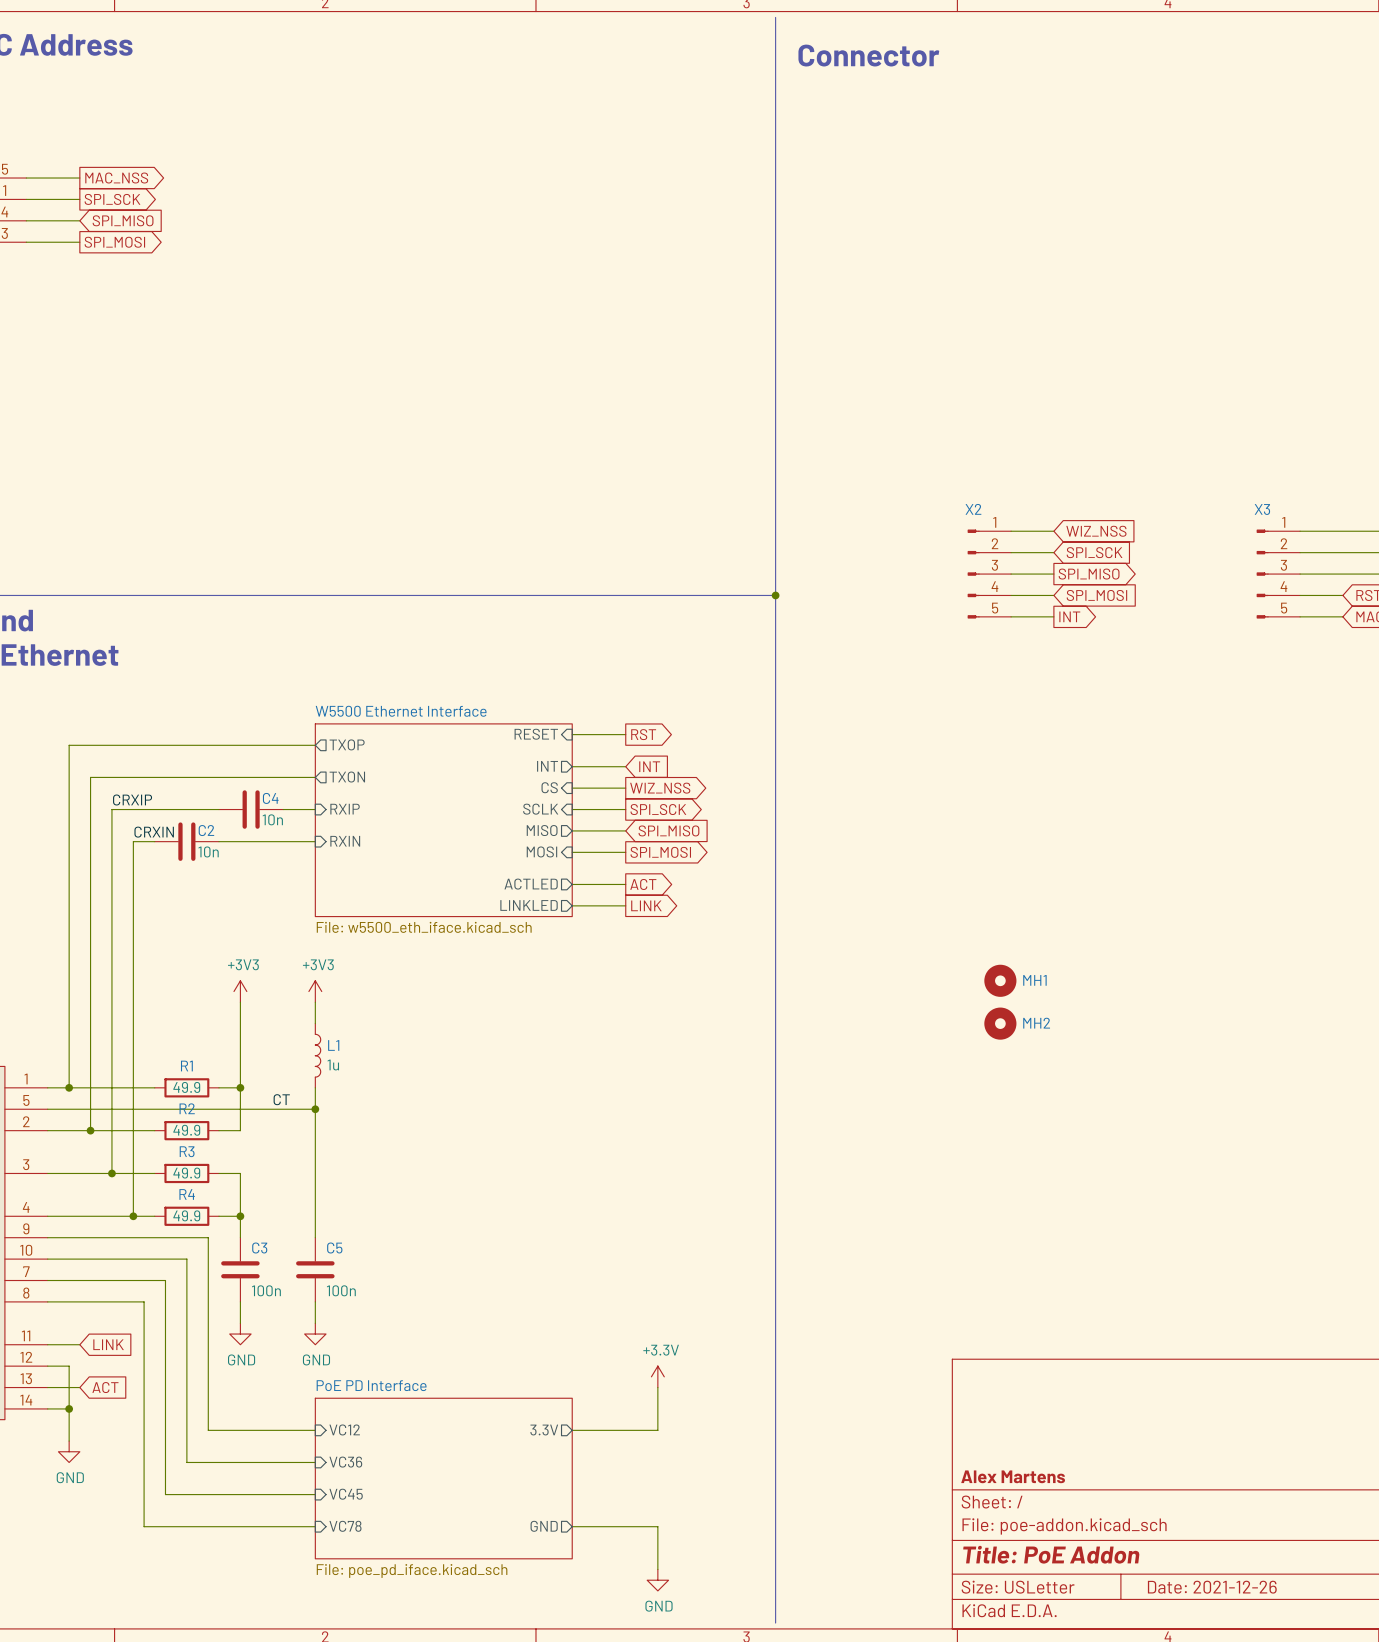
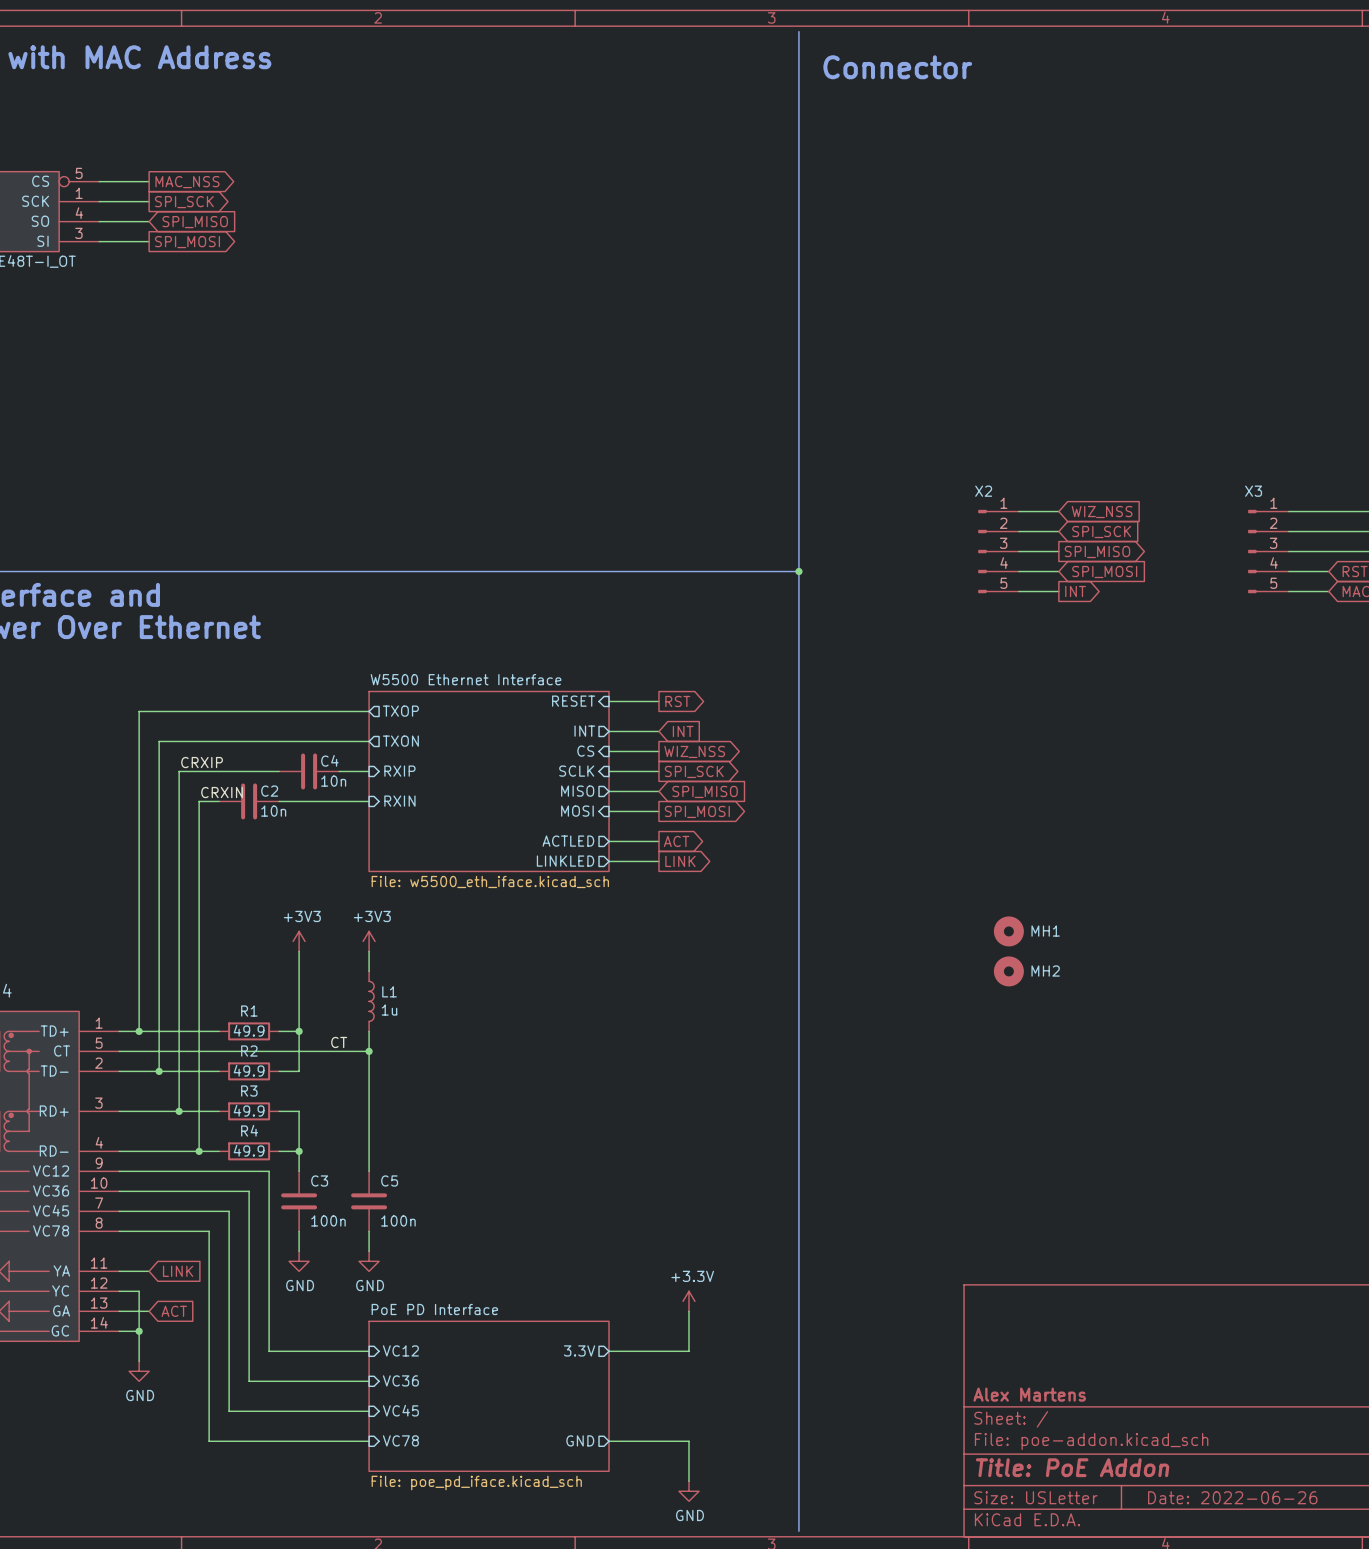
title block: Date: 2021-12-26 (1212, 1587) -> Date: 2022-06-26 (1232, 1497)

